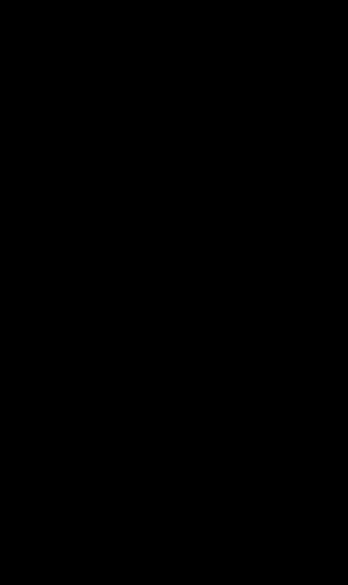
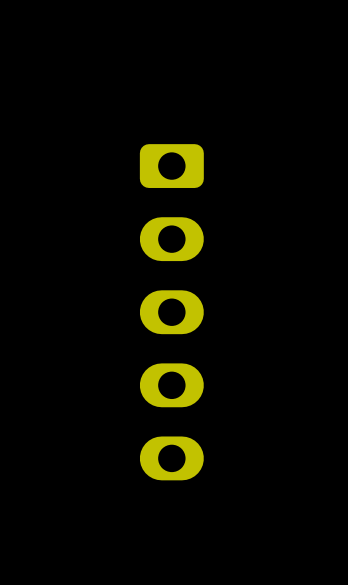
part: none -> (171, 312)

